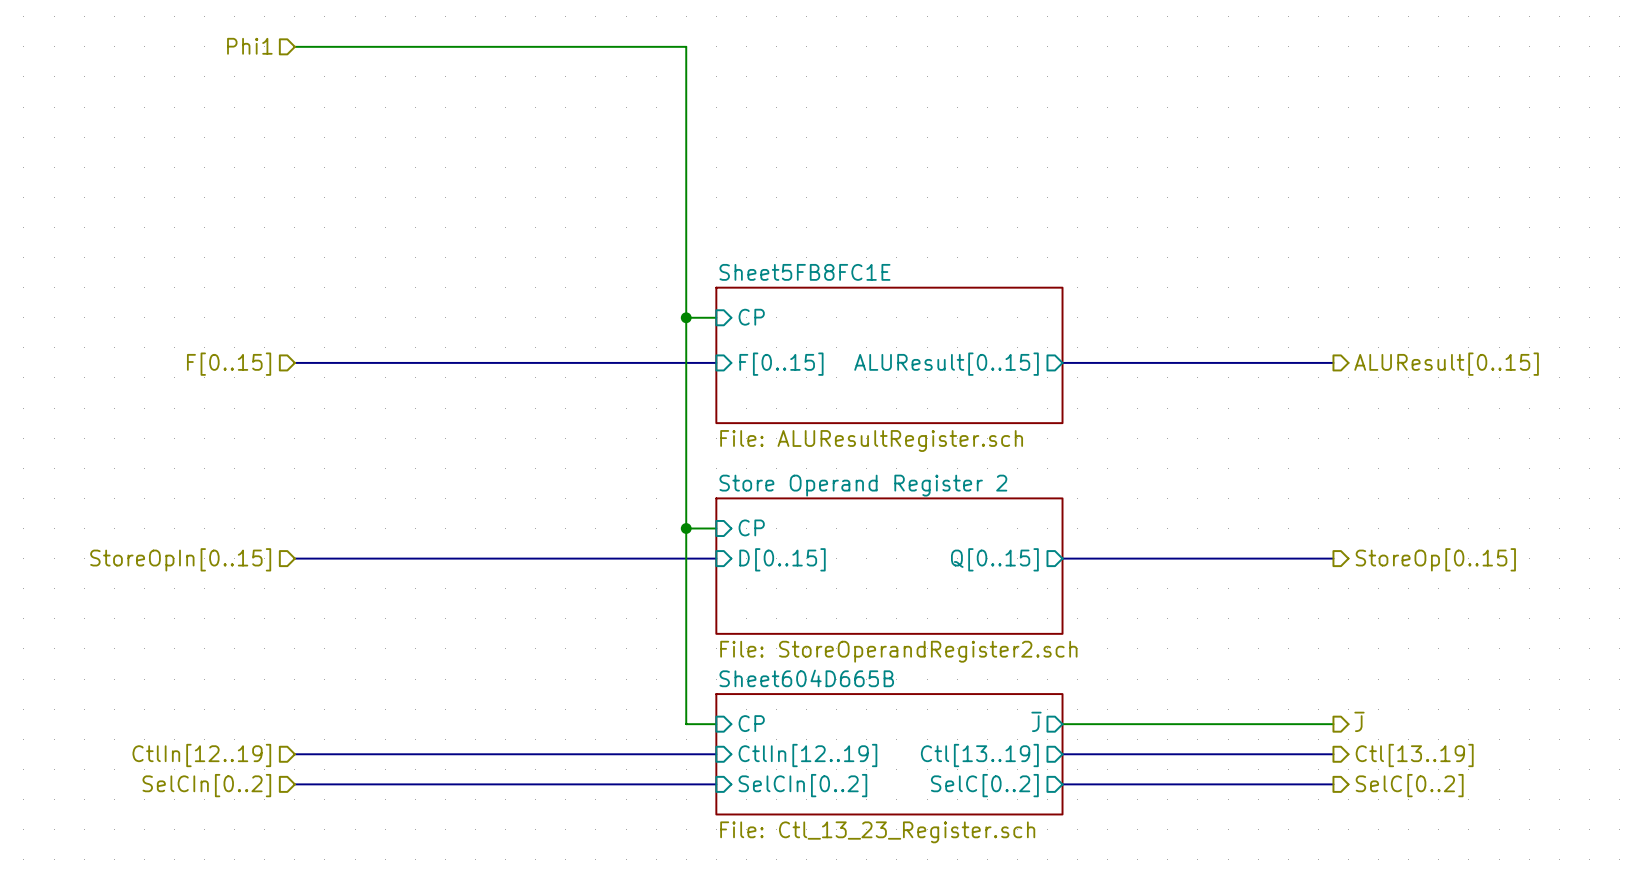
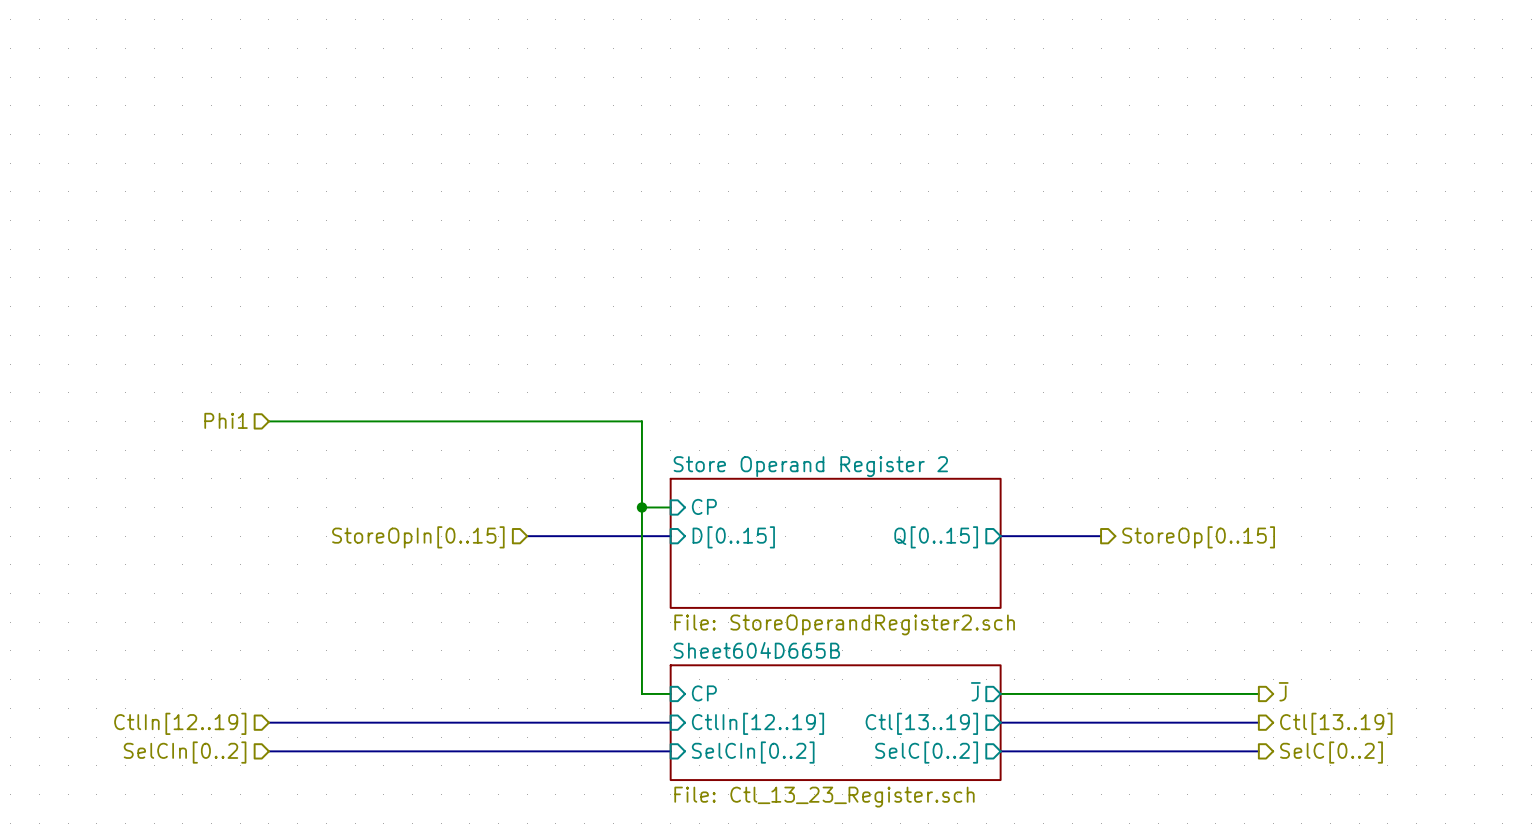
hierarchical label: Phi1 (249, 46) -> none
wire: (294, 46) (686, 46) (686, 438) -> (268, 421) (641, 421)
wire: (686, 317) (716, 317) -> none
junction: (686, 317) -> none
sheet pin: CP (751, 317) -> none
sheet Sheet5FB8FC1E: File: ALUResultRegister.sch (889, 355) -> none
bus: (294, 362) (716, 362) -> none
bus: (1062, 362) (1333, 362) -> none
hierarchical label: F[0..15] (229, 364) -> none
sheet pin: F[0..15] (781, 364) -> none
sheet pin: ALUResult[0..15] (946, 364) -> none
hierarchical label: ALUResult[0..15] (1446, 364) -> none
hierarchical label: none -> Phi1 (226, 420)
bus: (294, 558) (565, 558) -> none
bus: (1167, 558) (1333, 558) -> none
hierarchical label position: StoreOpIn[0..15] (180, 559) -> StoreOpIn[0..15] (418, 537)
hierarchical label position: StoreOp[0..15] (1435, 559) -> StoreOp[0..15] (1198, 537)

